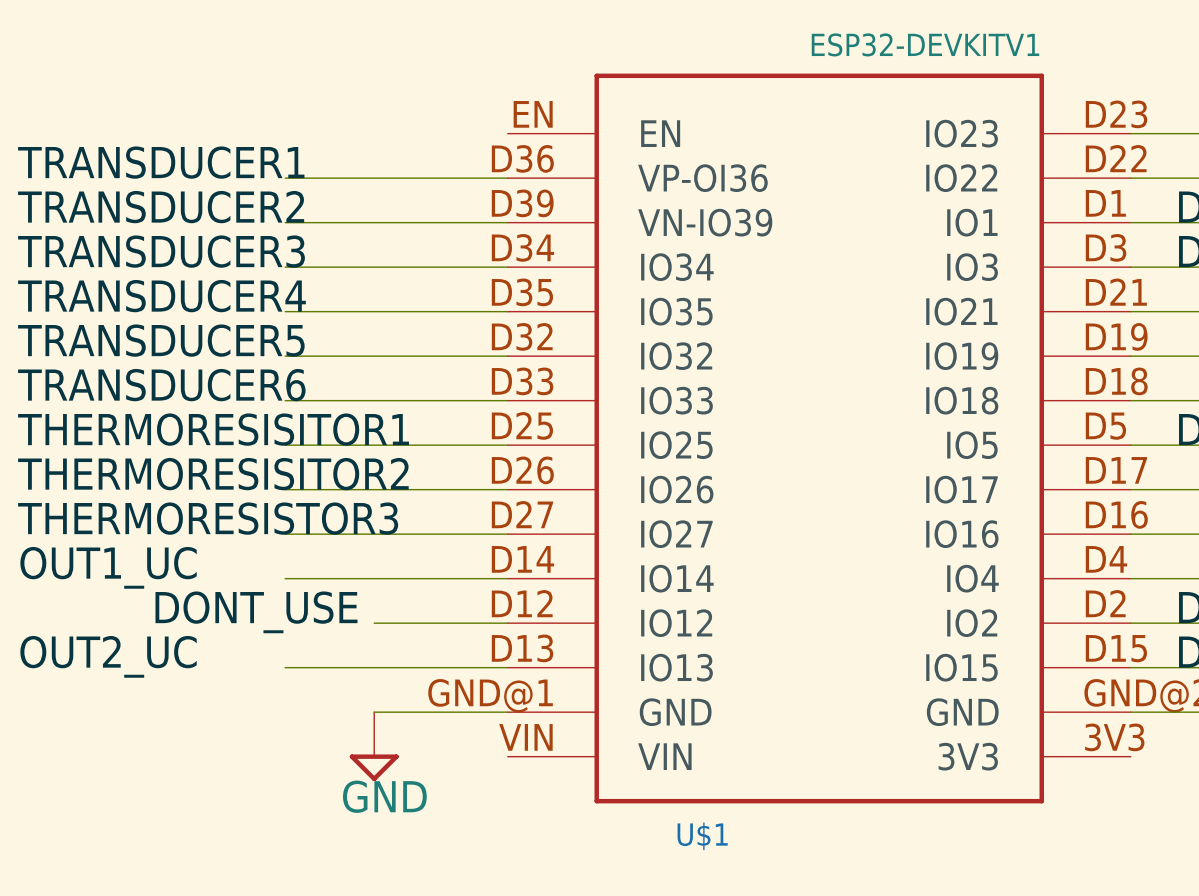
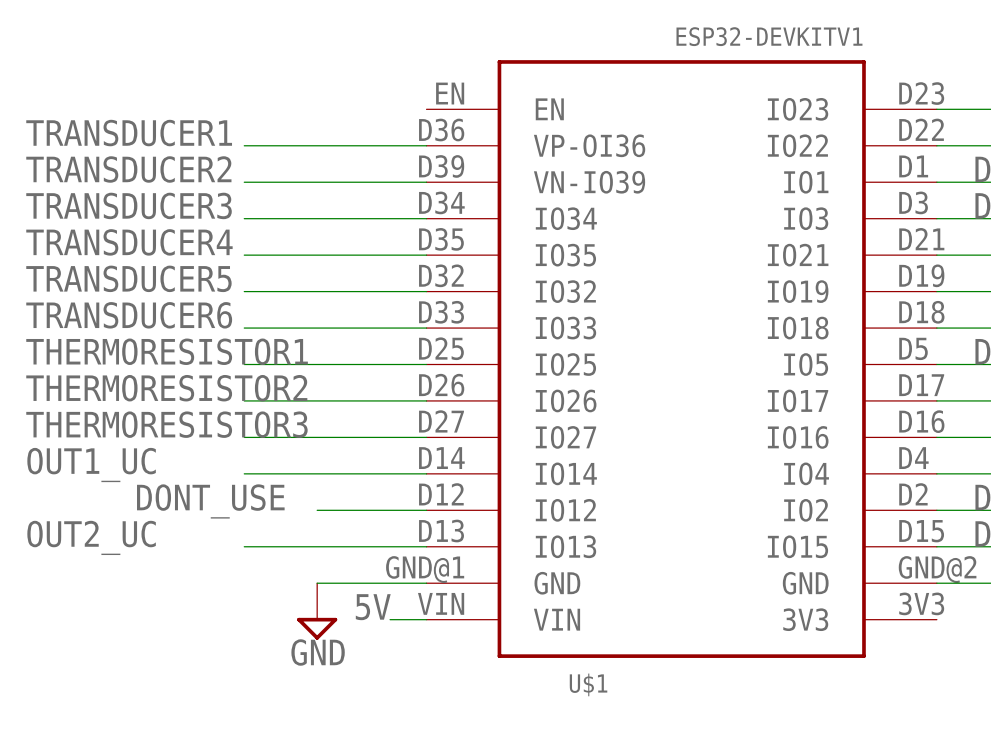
label: THERMORESISITOR1 (213, 429) -> THERMORESISTOR1 (167, 351)
label: THERMORESISITOR2 (213, 474) -> THERMORESISTOR2 (166, 388)
label: none -> 5V (373, 607)
wire: none -> (390, 619) (426, 619)

